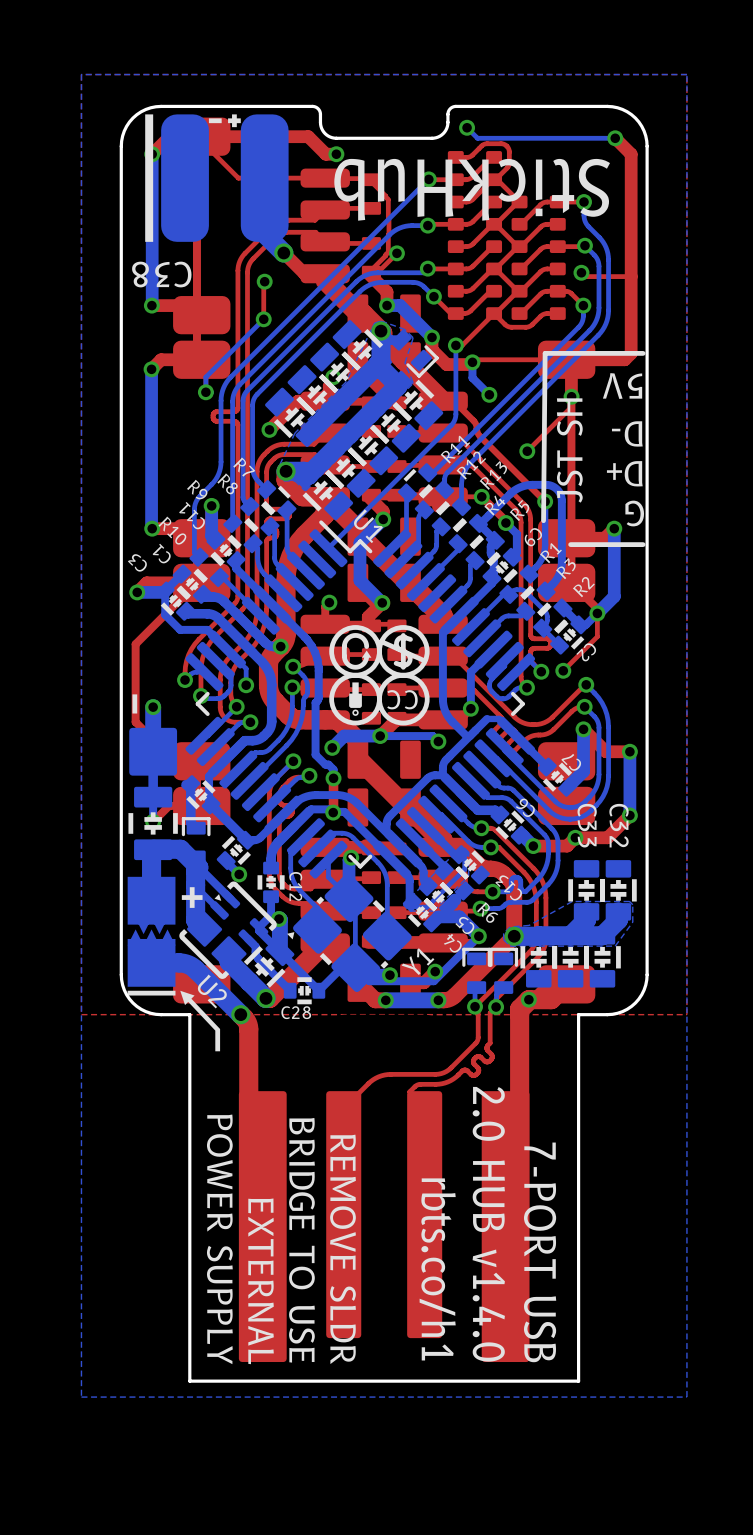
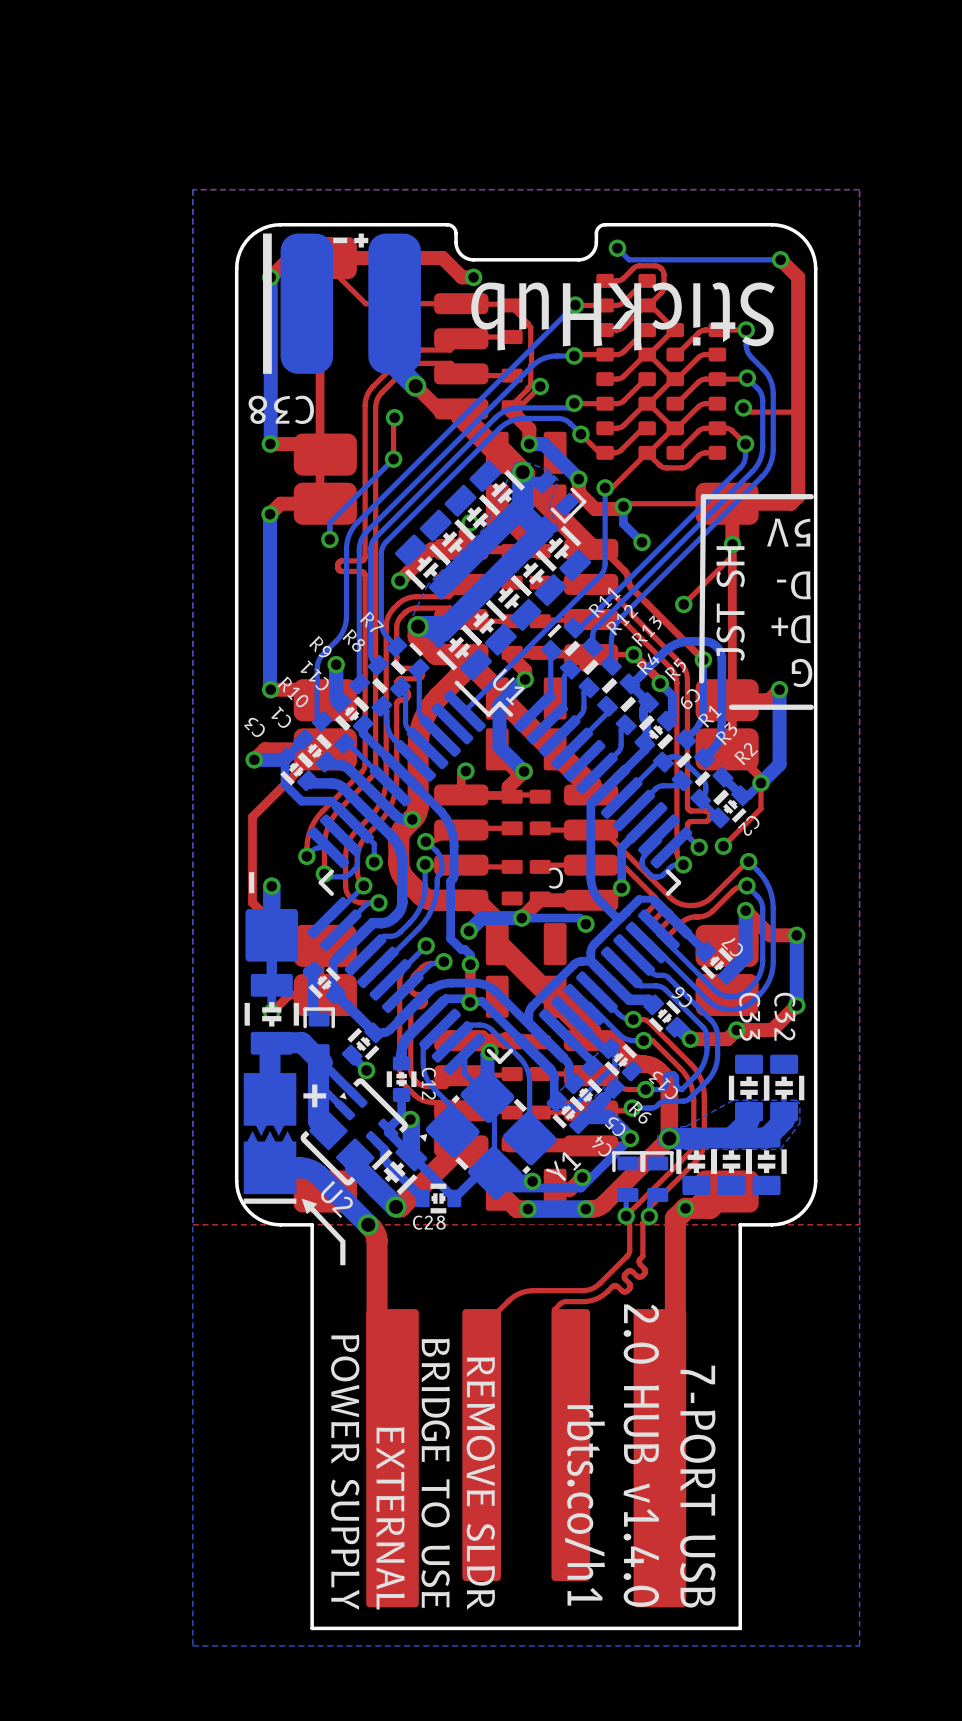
drawing: [329, 625, 430, 726] -> none
drawing shape: [377, 672, 430, 726] -> [548, 867, 564, 889]

